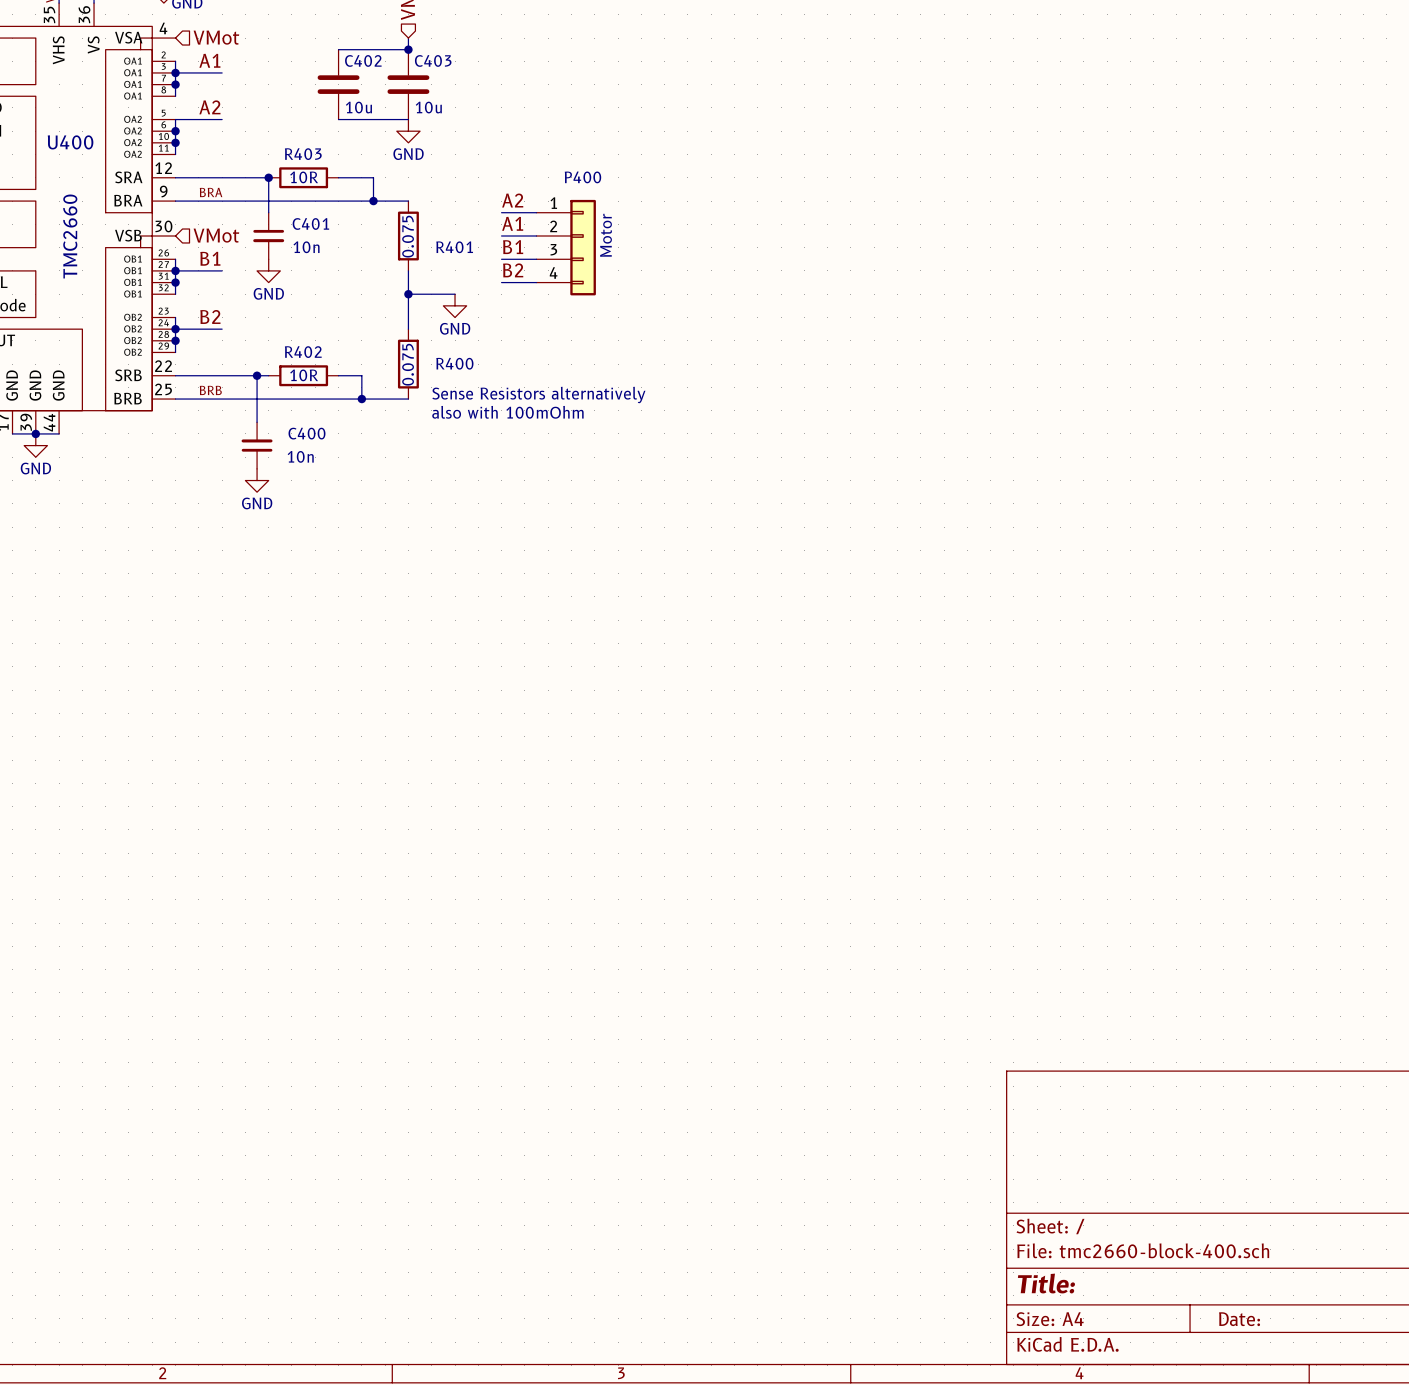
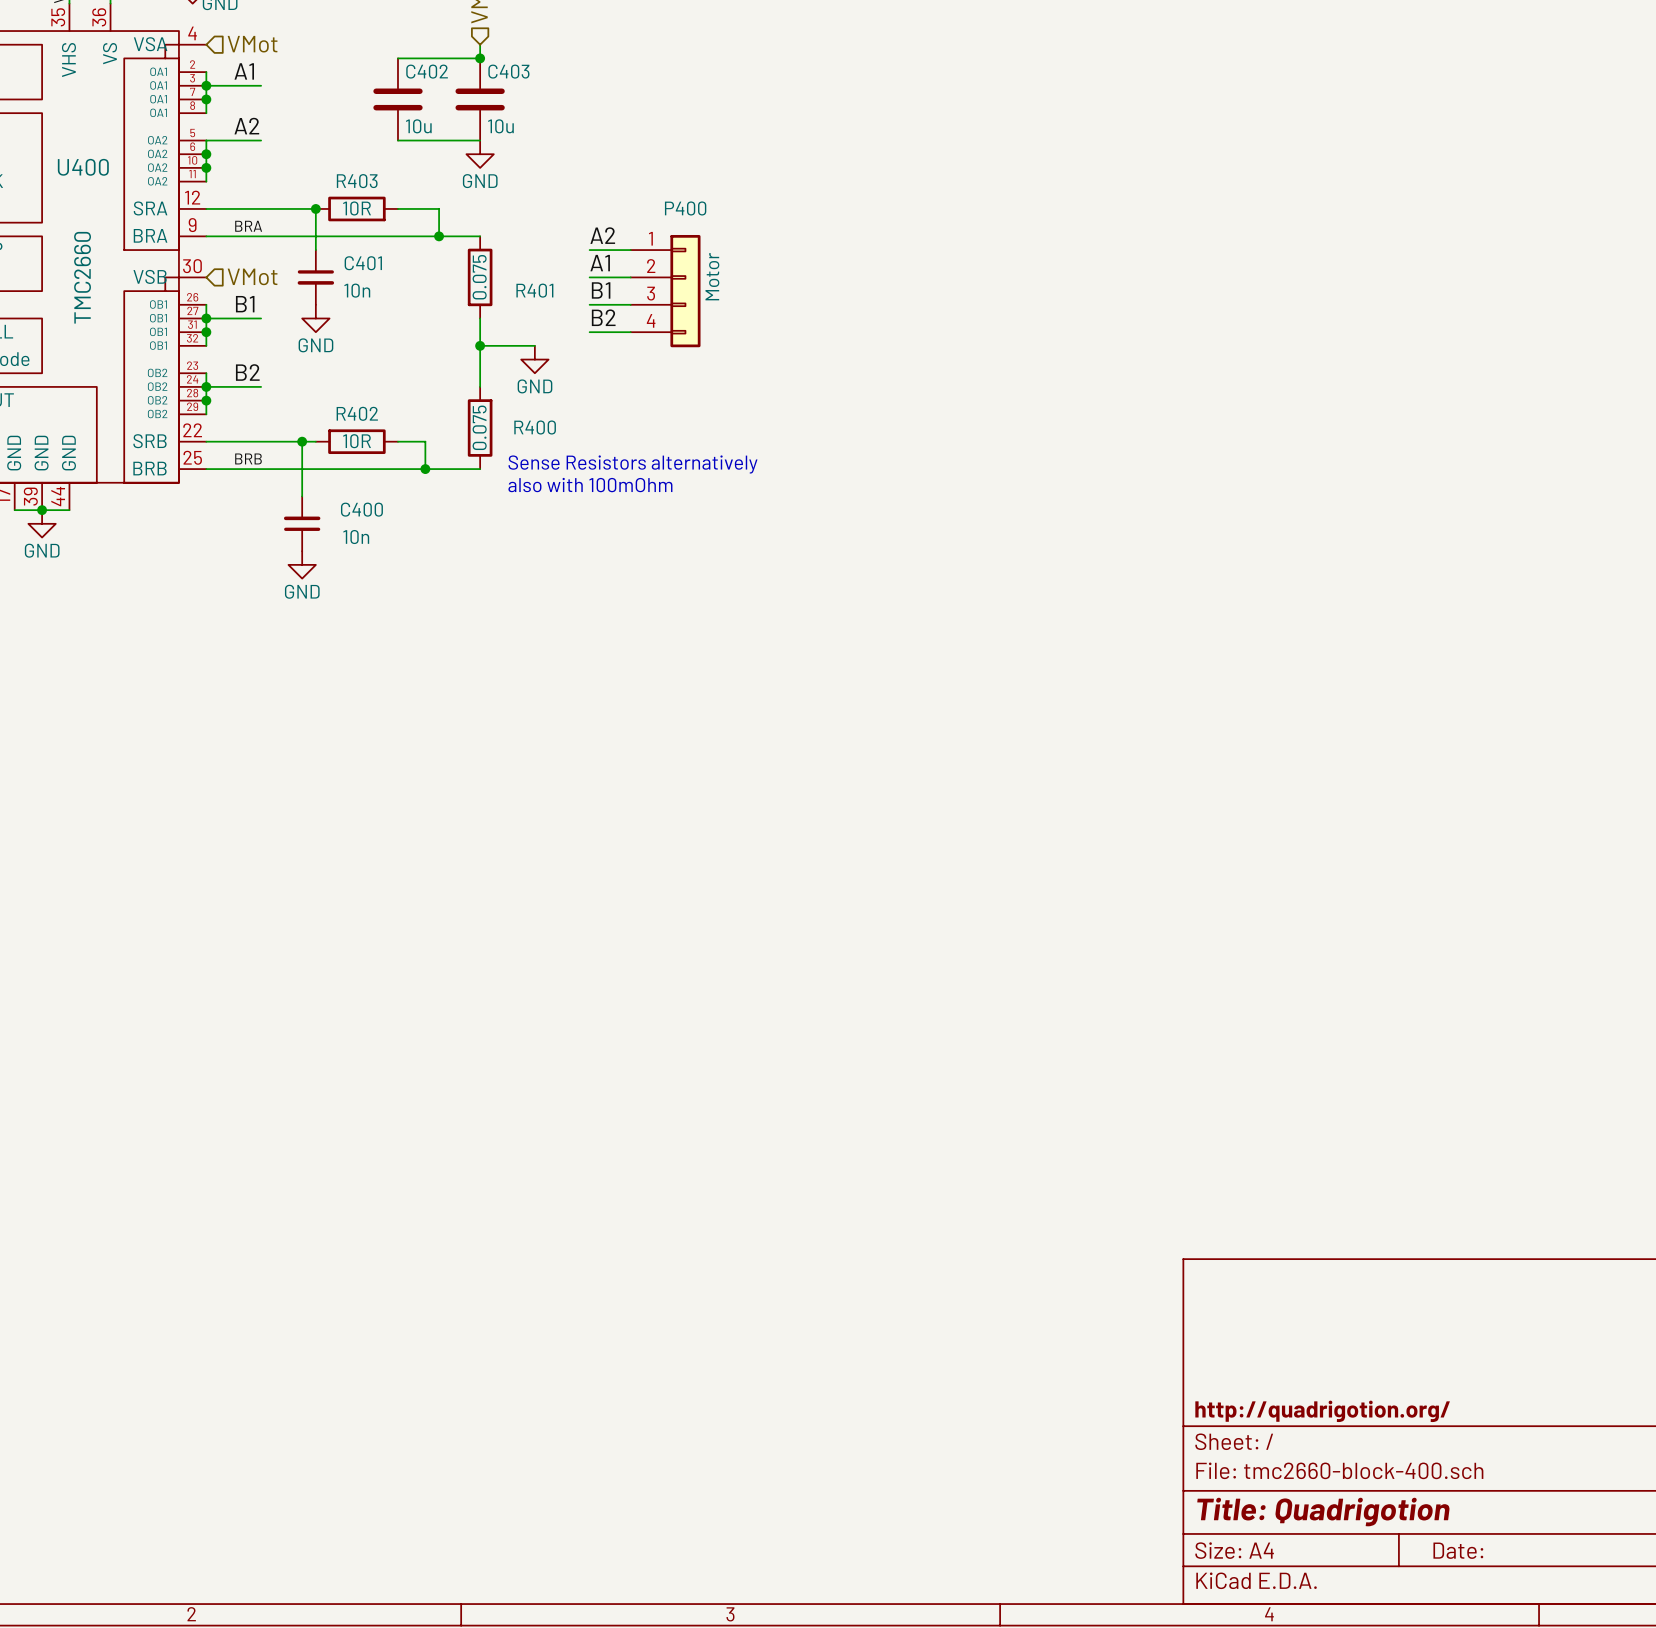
title block: none -> http://quadrigotion.org/ (1322, 1411)
title block: Title: (1046, 1283) -> Title: Quadrigotion (1323, 1512)

